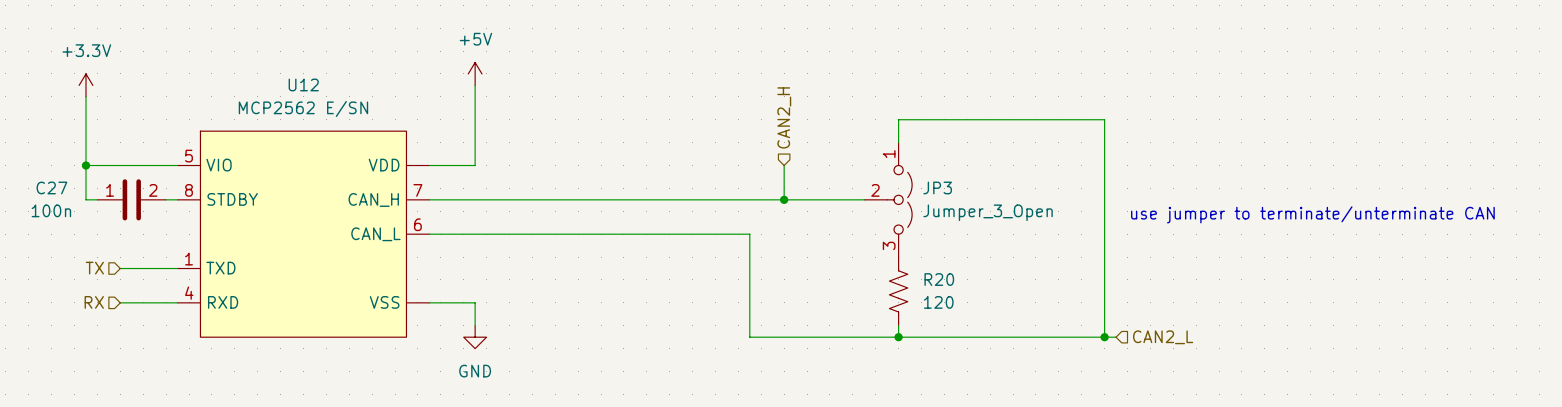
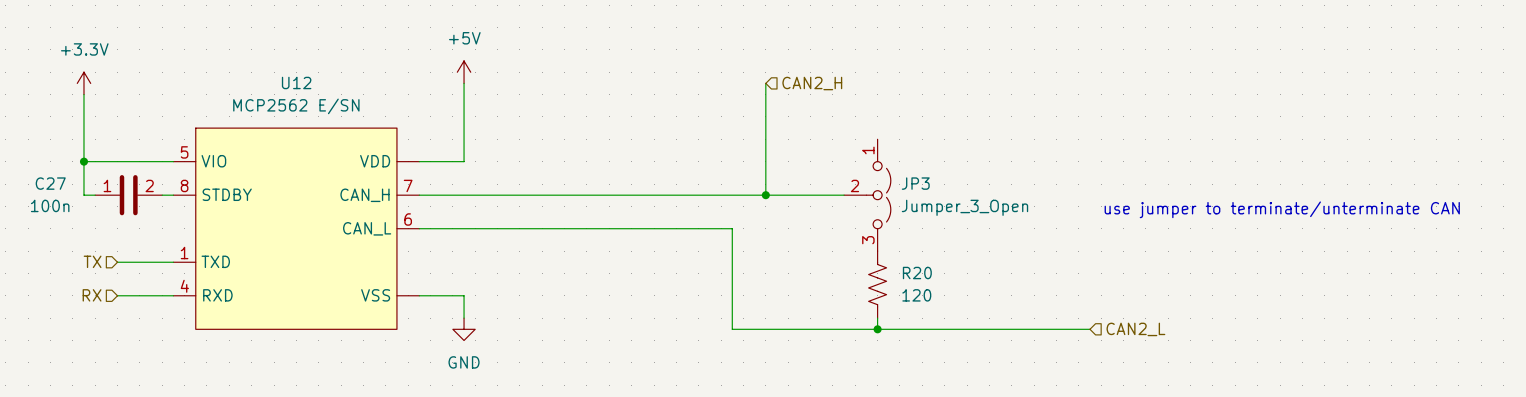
wire: none -> (765, 83) (765, 161)
hierarchical label rotation: 0° (784, 117) -> 90° clockwise (812, 83)
wire: (898, 142) (898, 119) (1104, 119) (1104, 337) -> none
junction: (1104, 337) -> none

